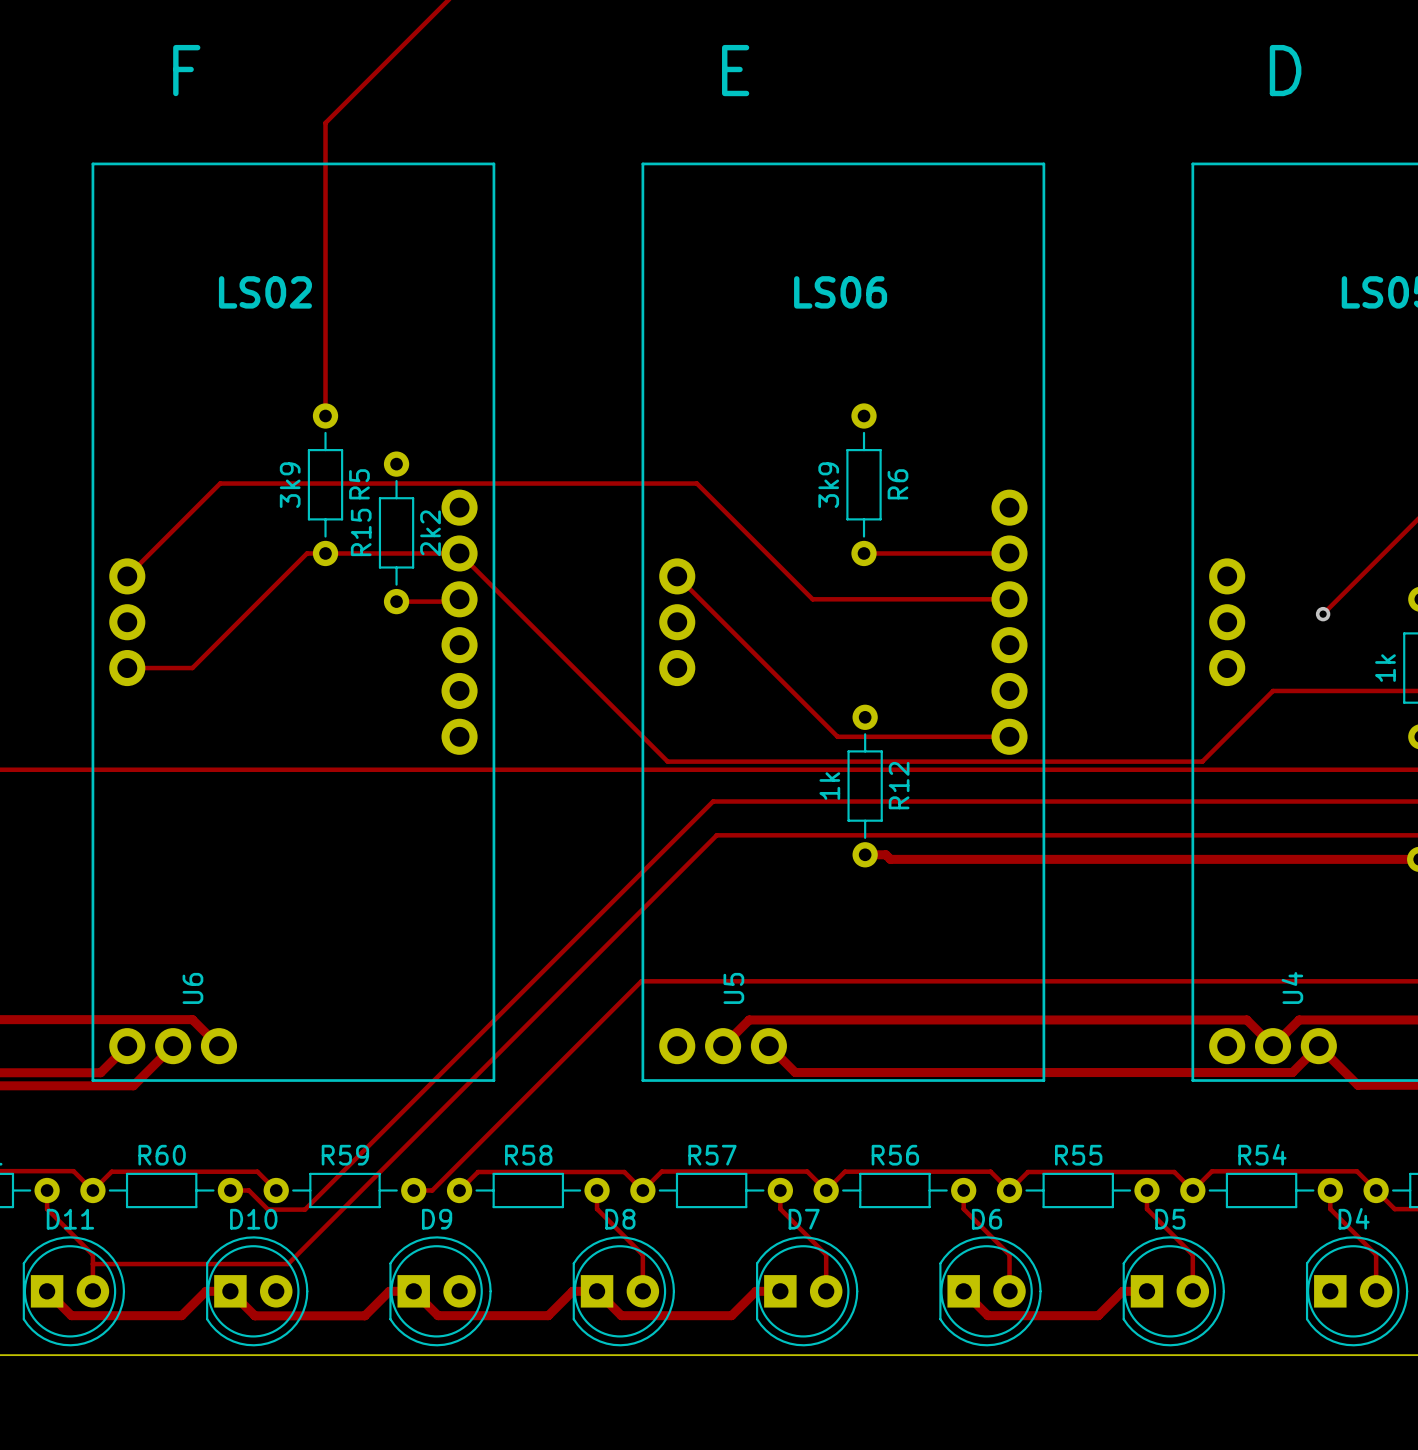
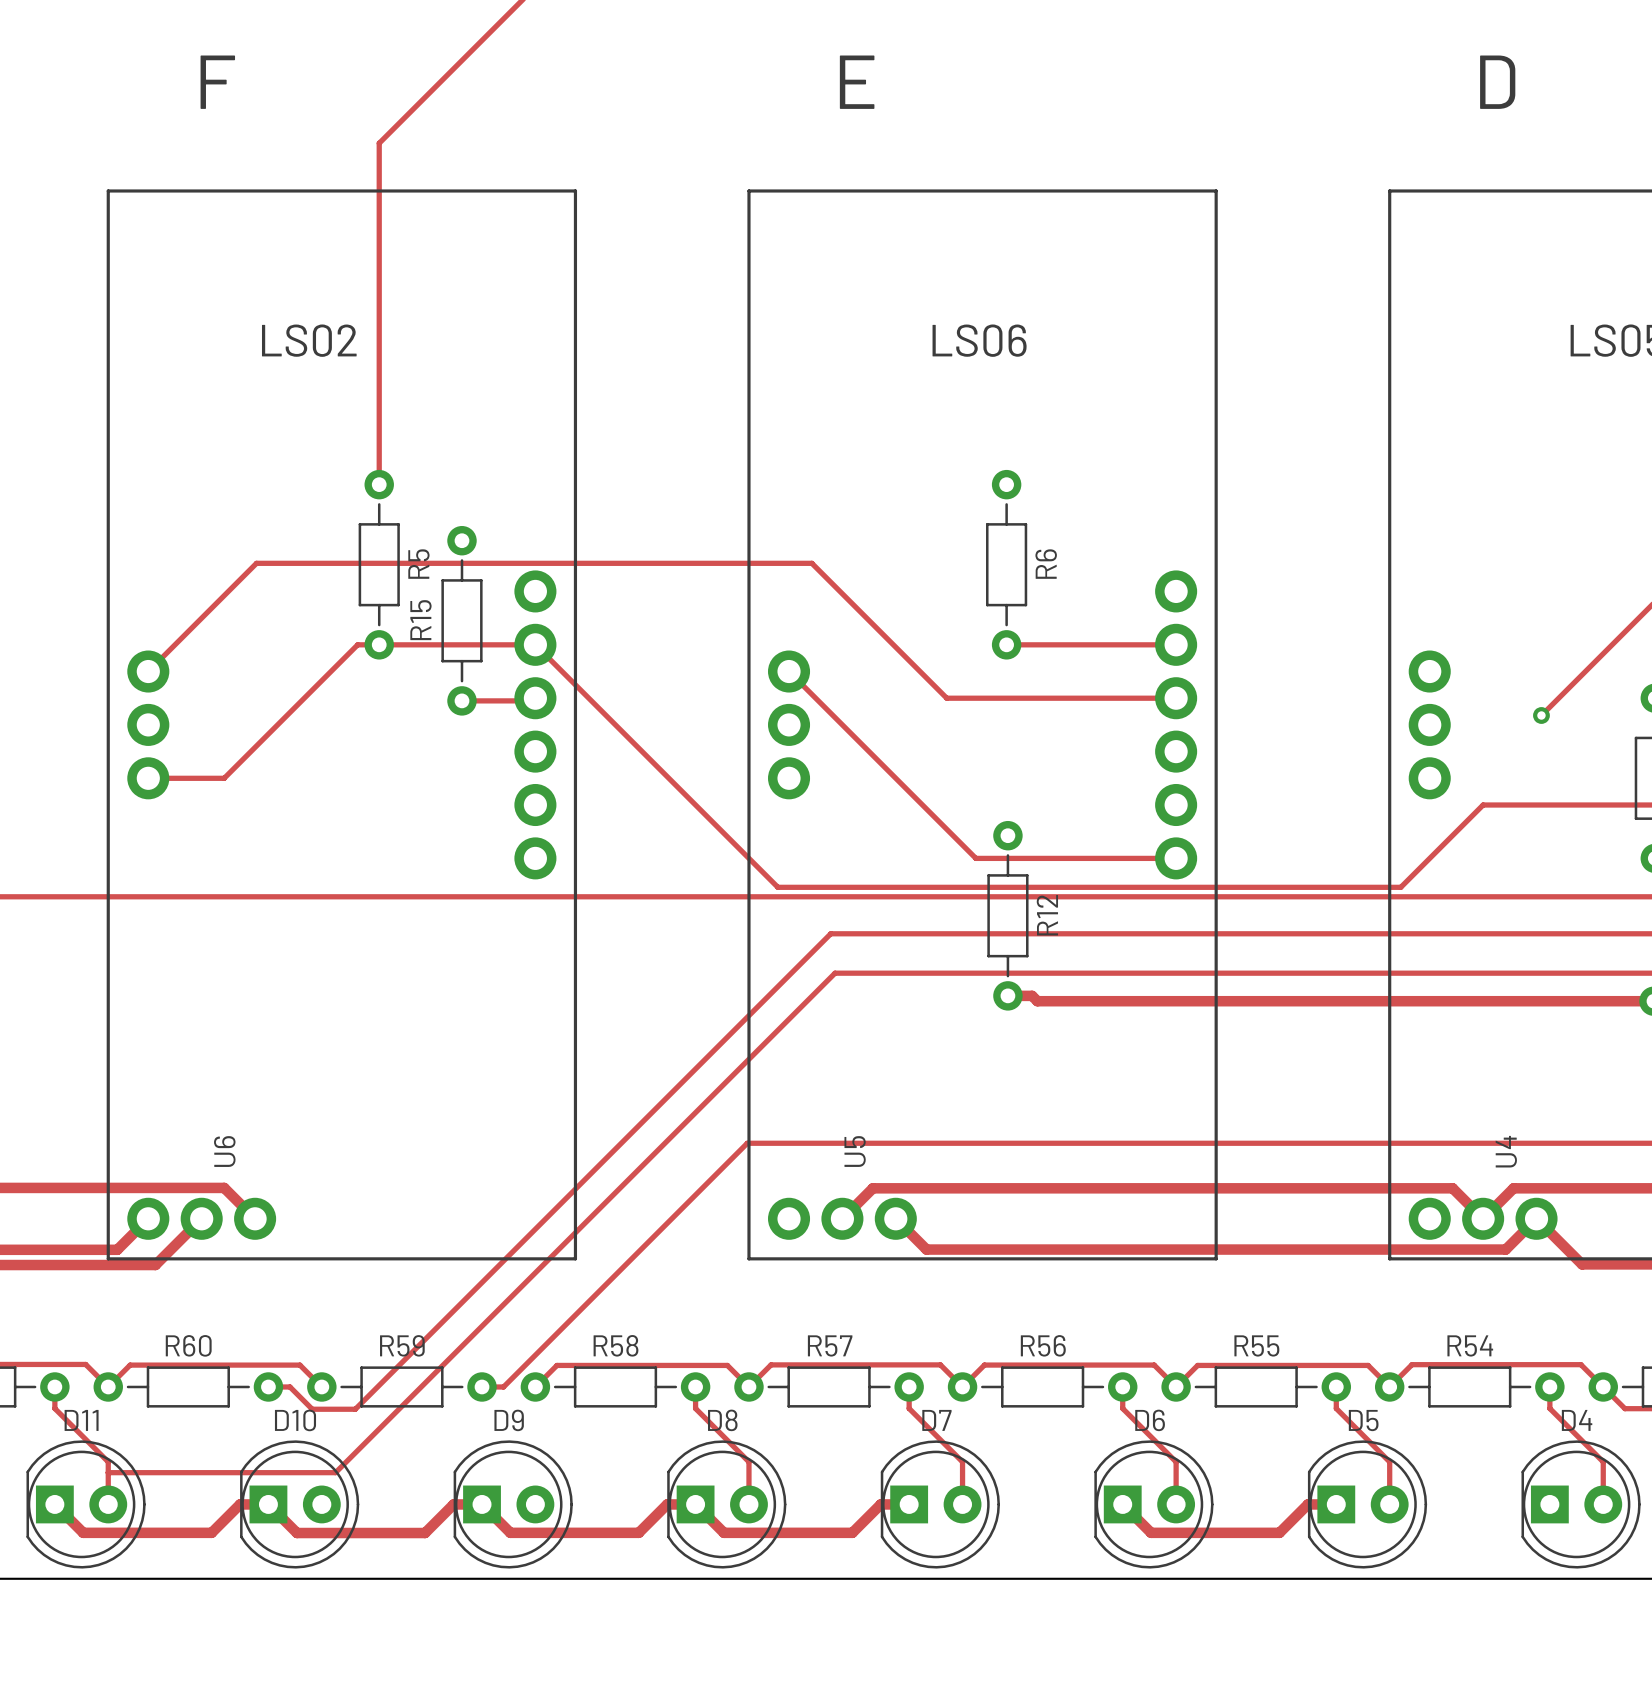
R5 value: 3k9 (290, 485) -> none
R6 value: 3k9 (828, 485) -> none
R15 value: 2k2 (430, 533) -> none
part value: 1k (1385, 668) -> none
R12 value: 1k (829, 786) -> none

